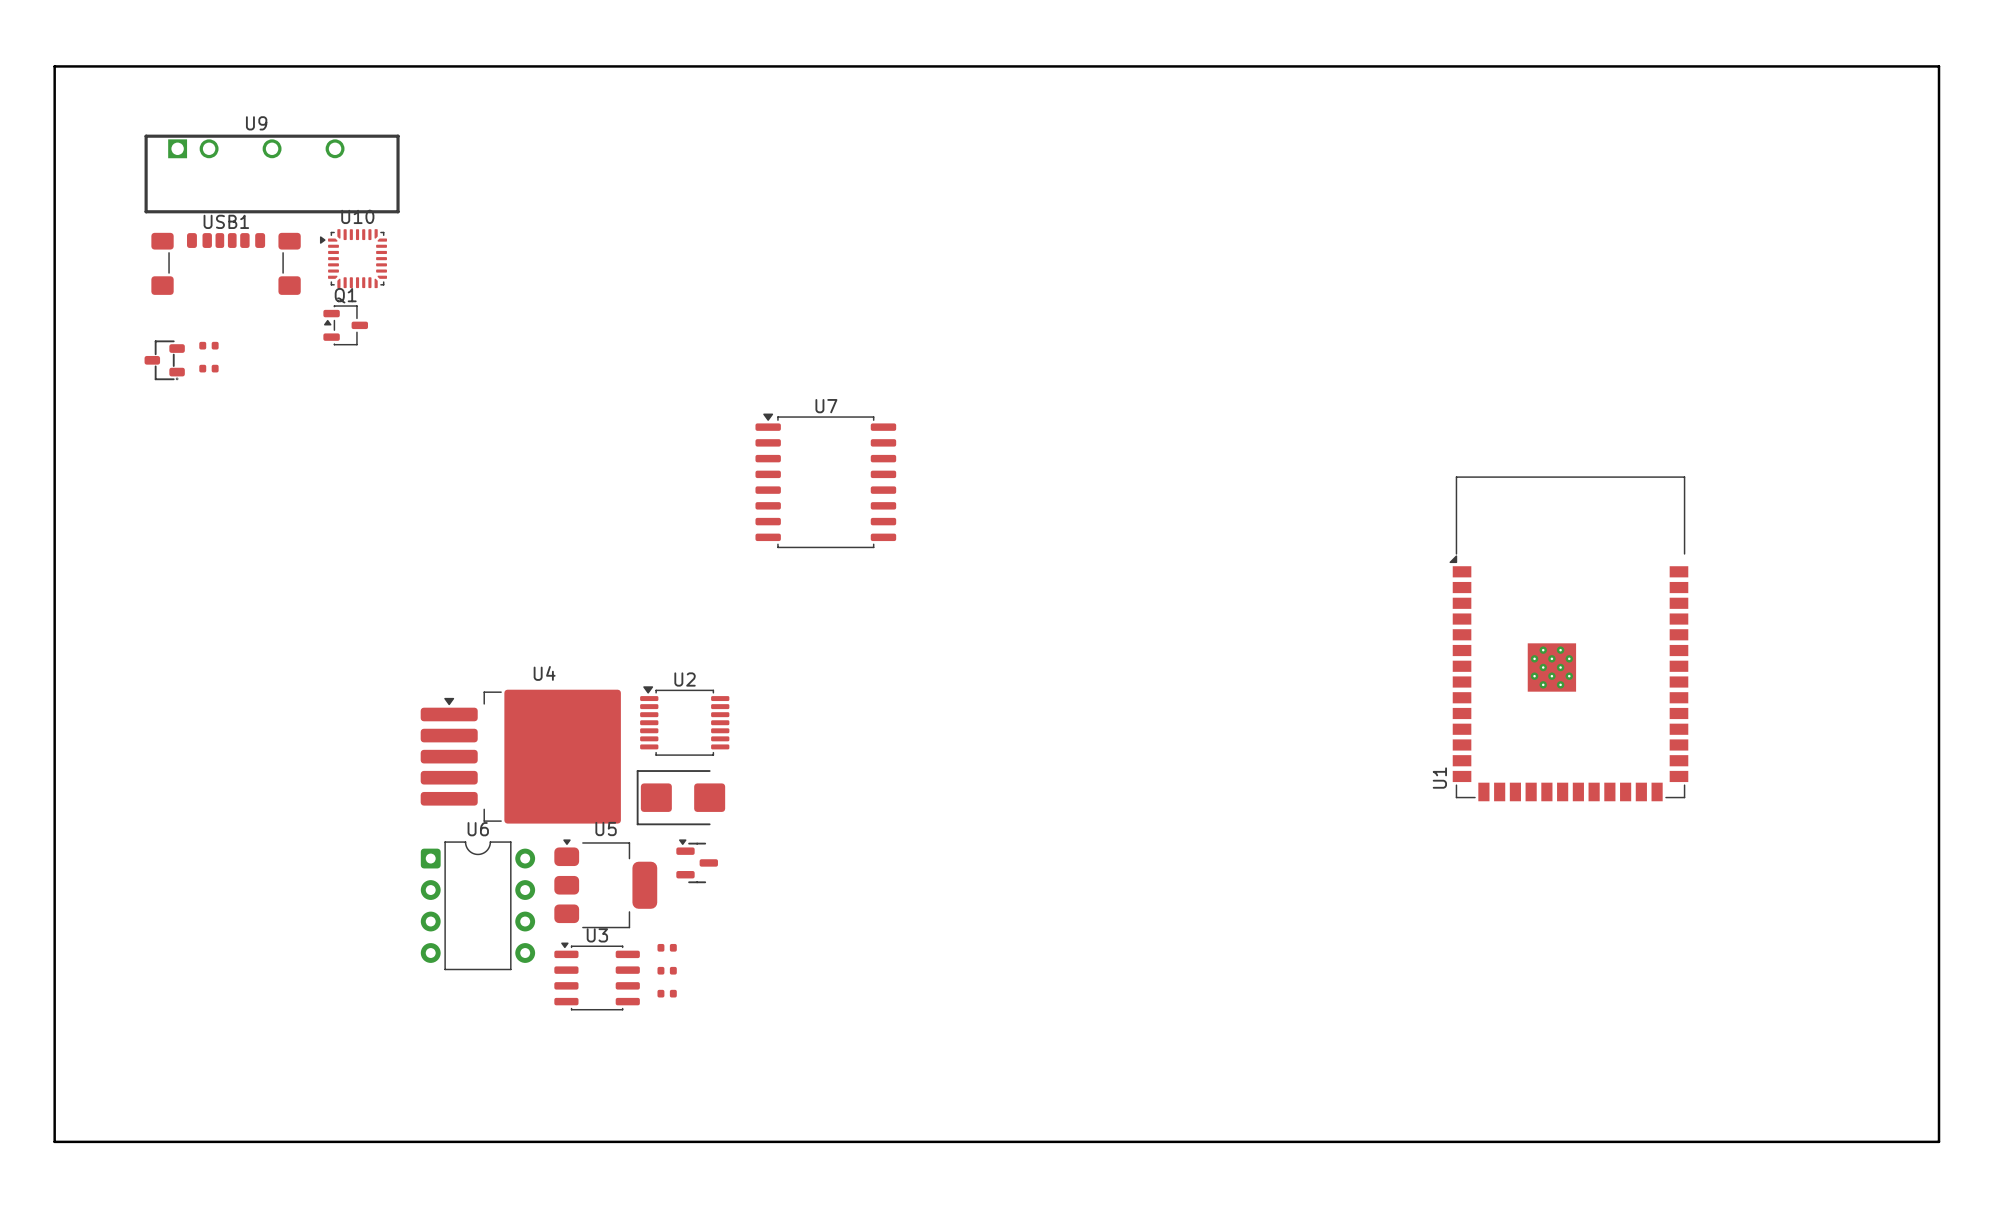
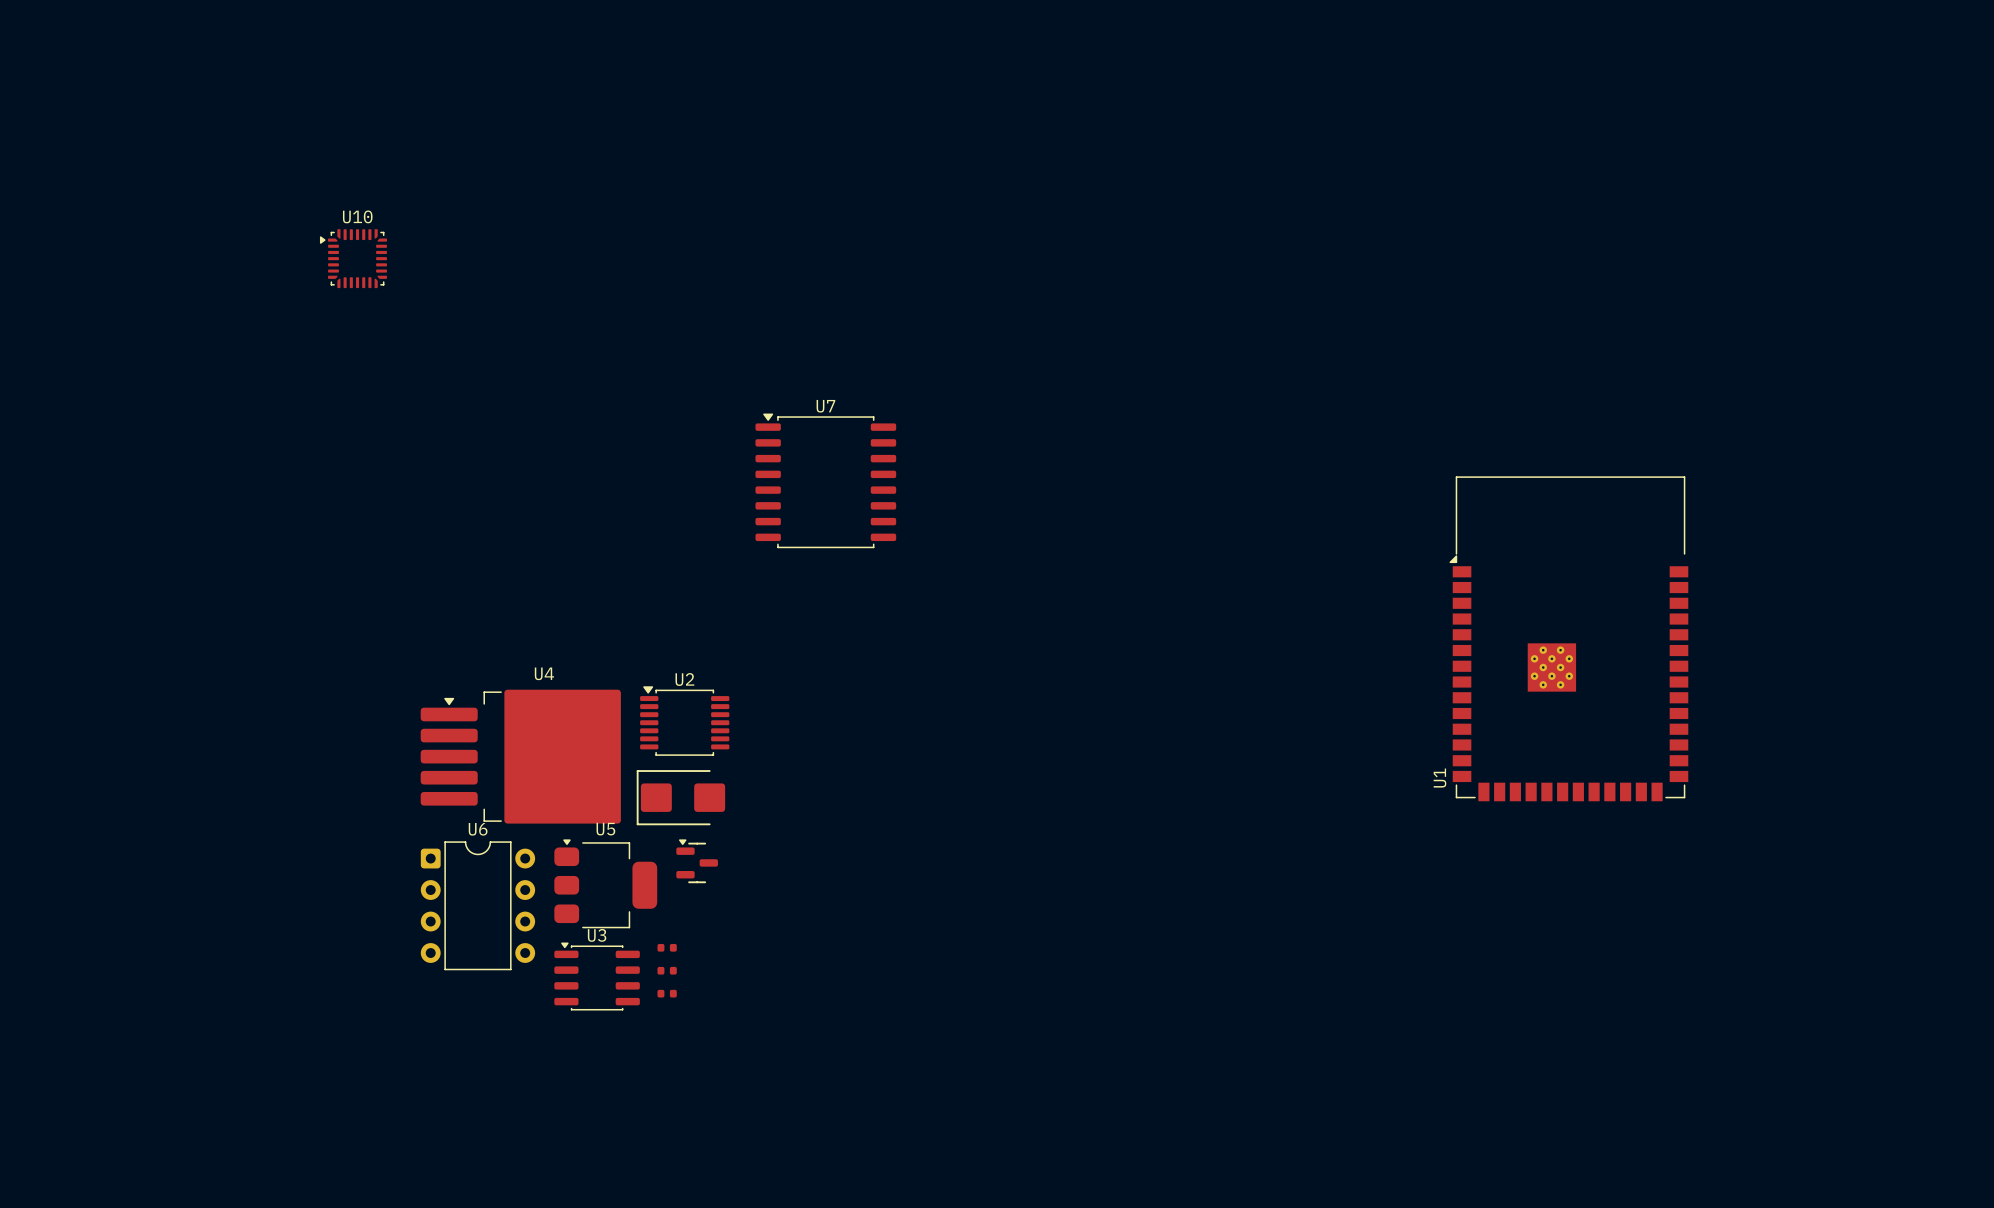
board edge: (54, 66) (1939, 66) (1939, 1141) (54, 1141) (54, 66) -> none
U9: (272, 173) -> none
USB1: (226, 263) -> none
Q1: (345, 325) -> none
part: (208, 345) -> none
part: (164, 360) -> none
part: (208, 368) -> none

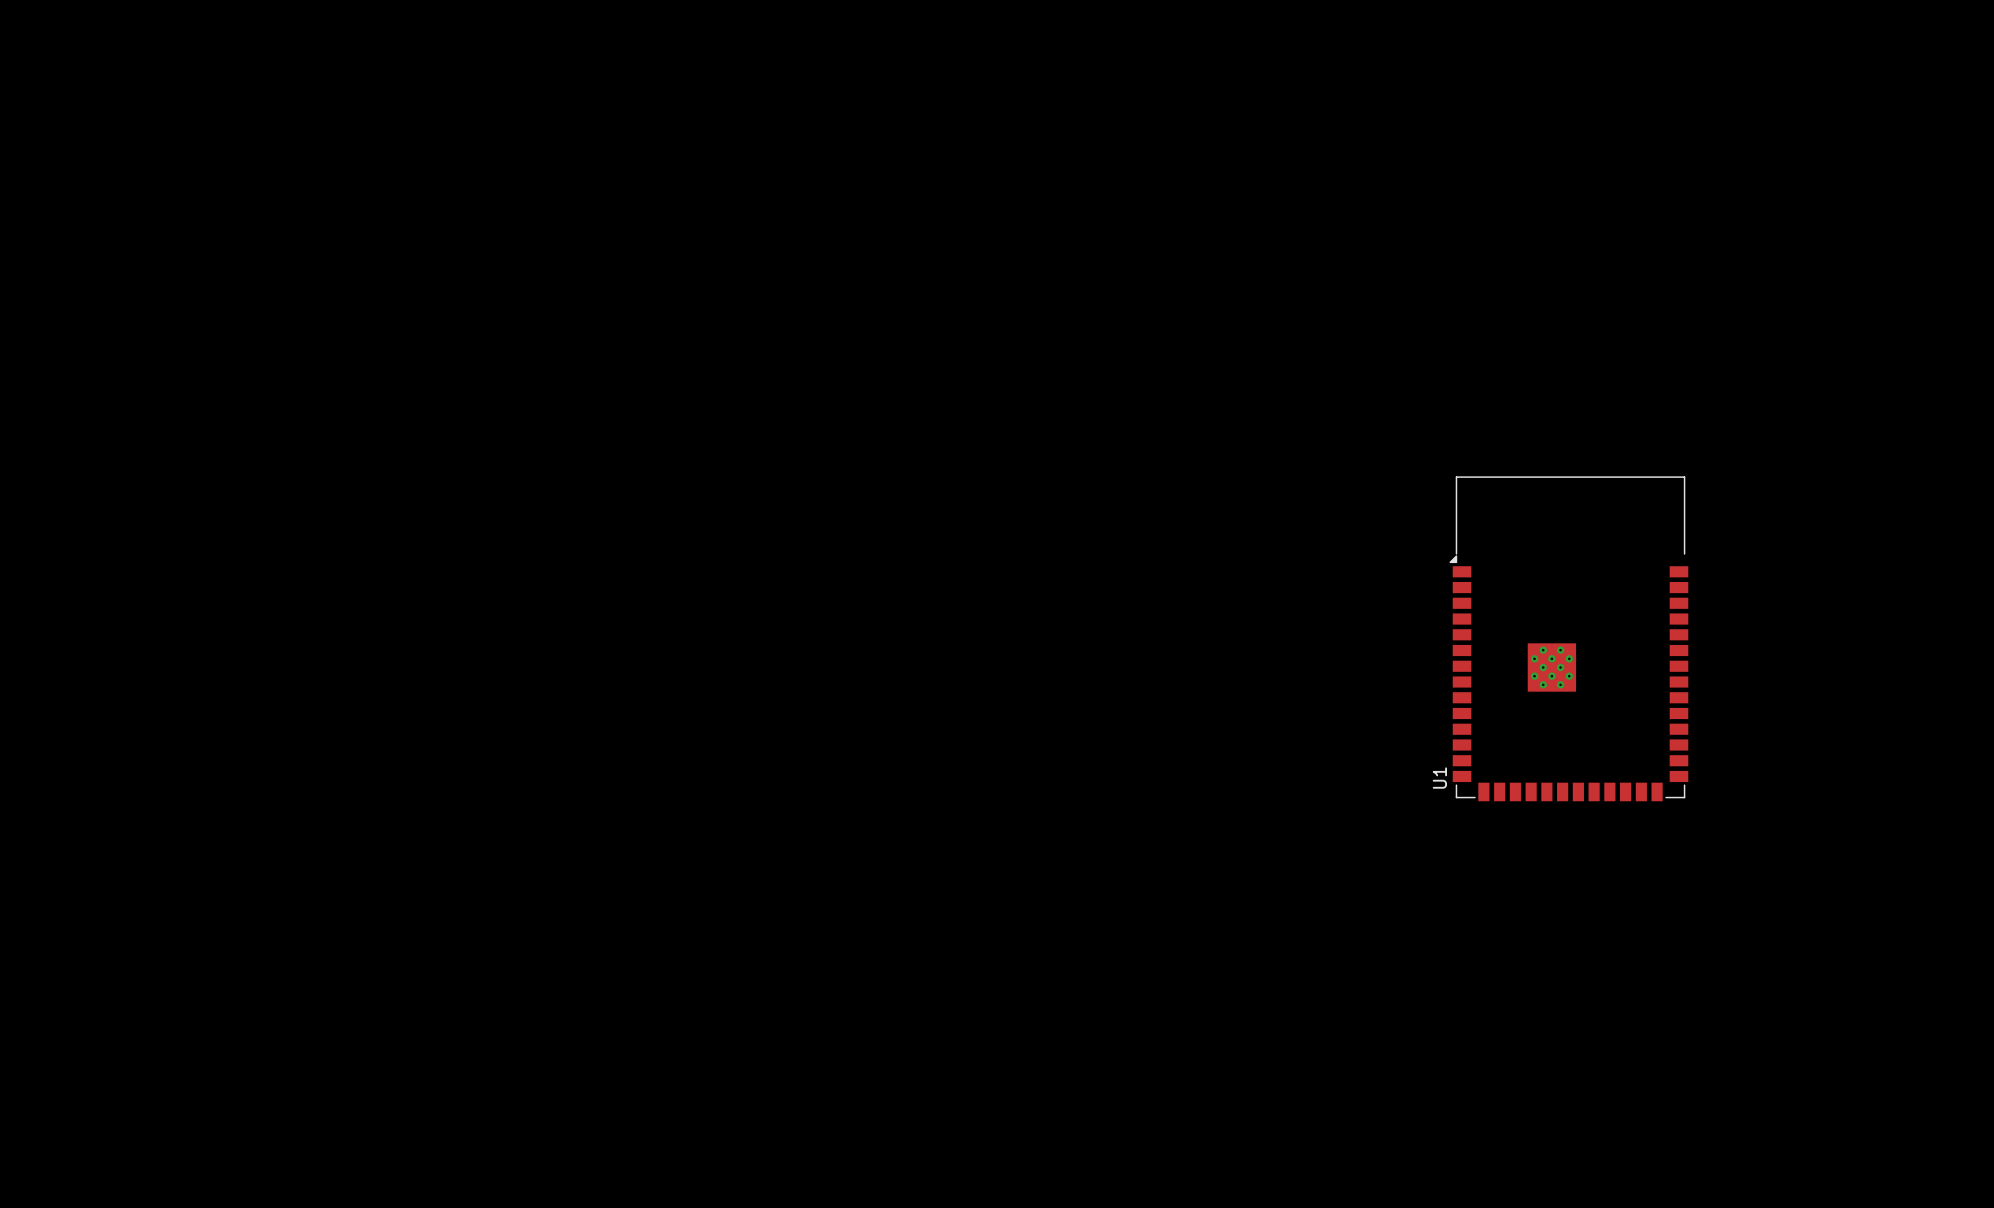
U10: (353, 258) -> none
U7: (825, 480) -> none
U2: (684, 721) -> none
U4: (520, 756) -> none
part: (680, 797) -> none
part: (697, 861) -> none
U5: (605, 883) -> none
U6: (477, 905) -> none
part: (667, 947) -> none
part: (667, 970) -> none
U3: (597, 976) -> none
part: (667, 993) -> none

